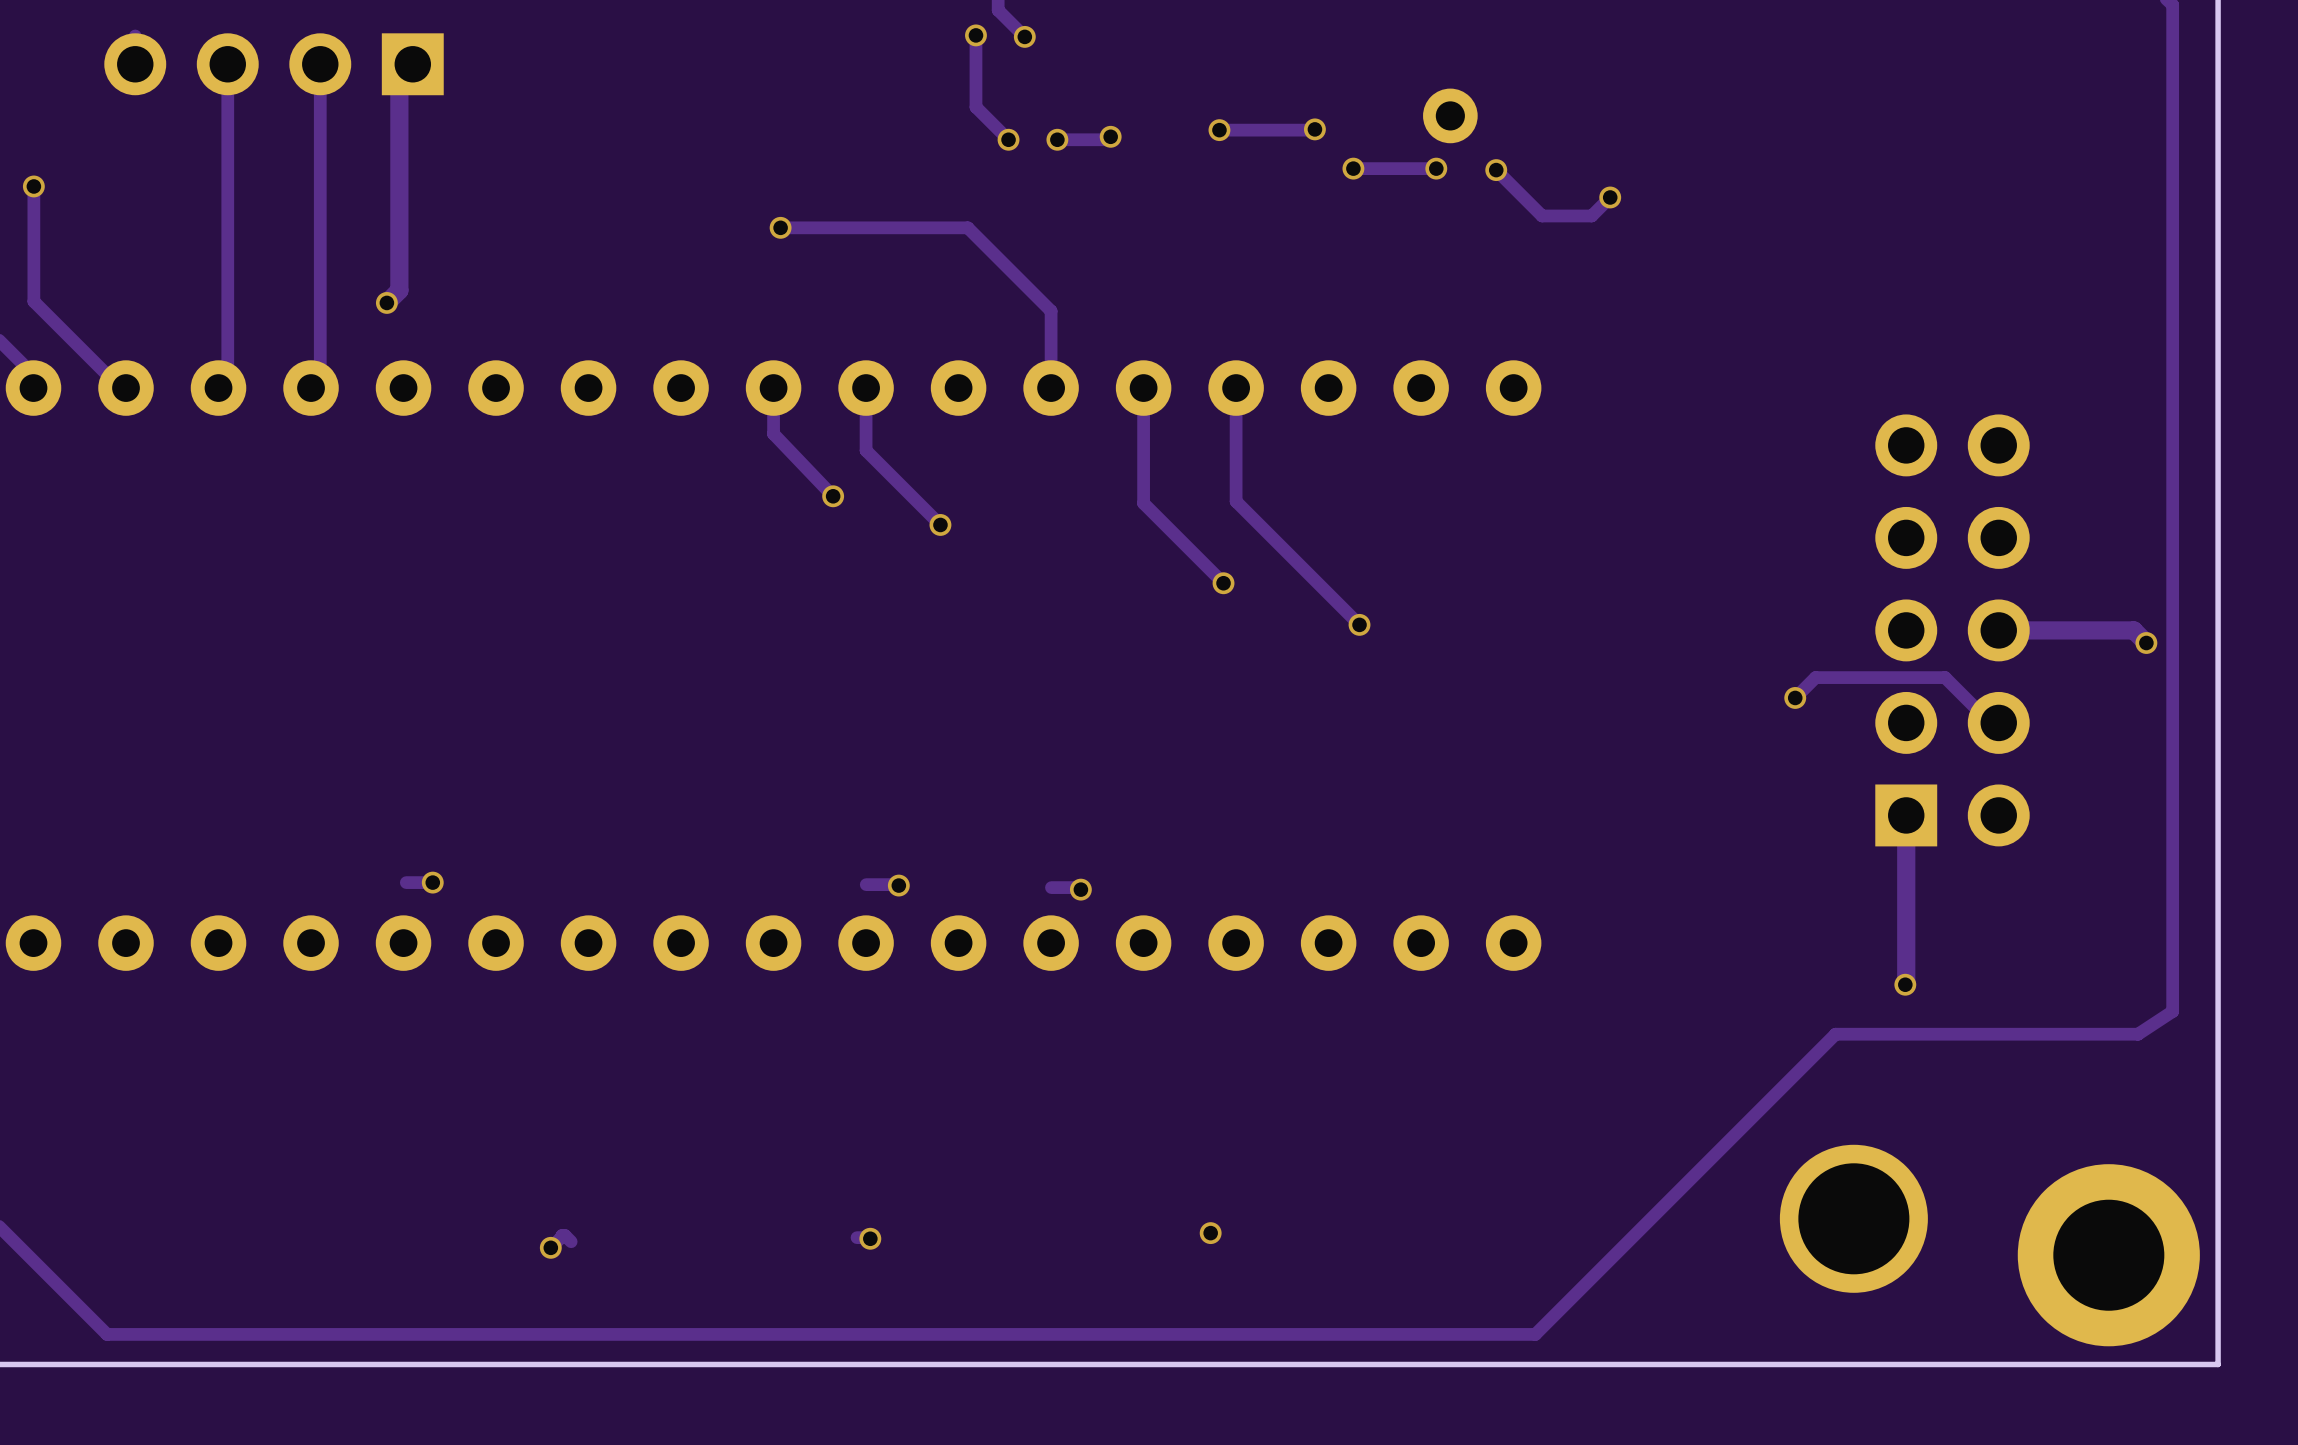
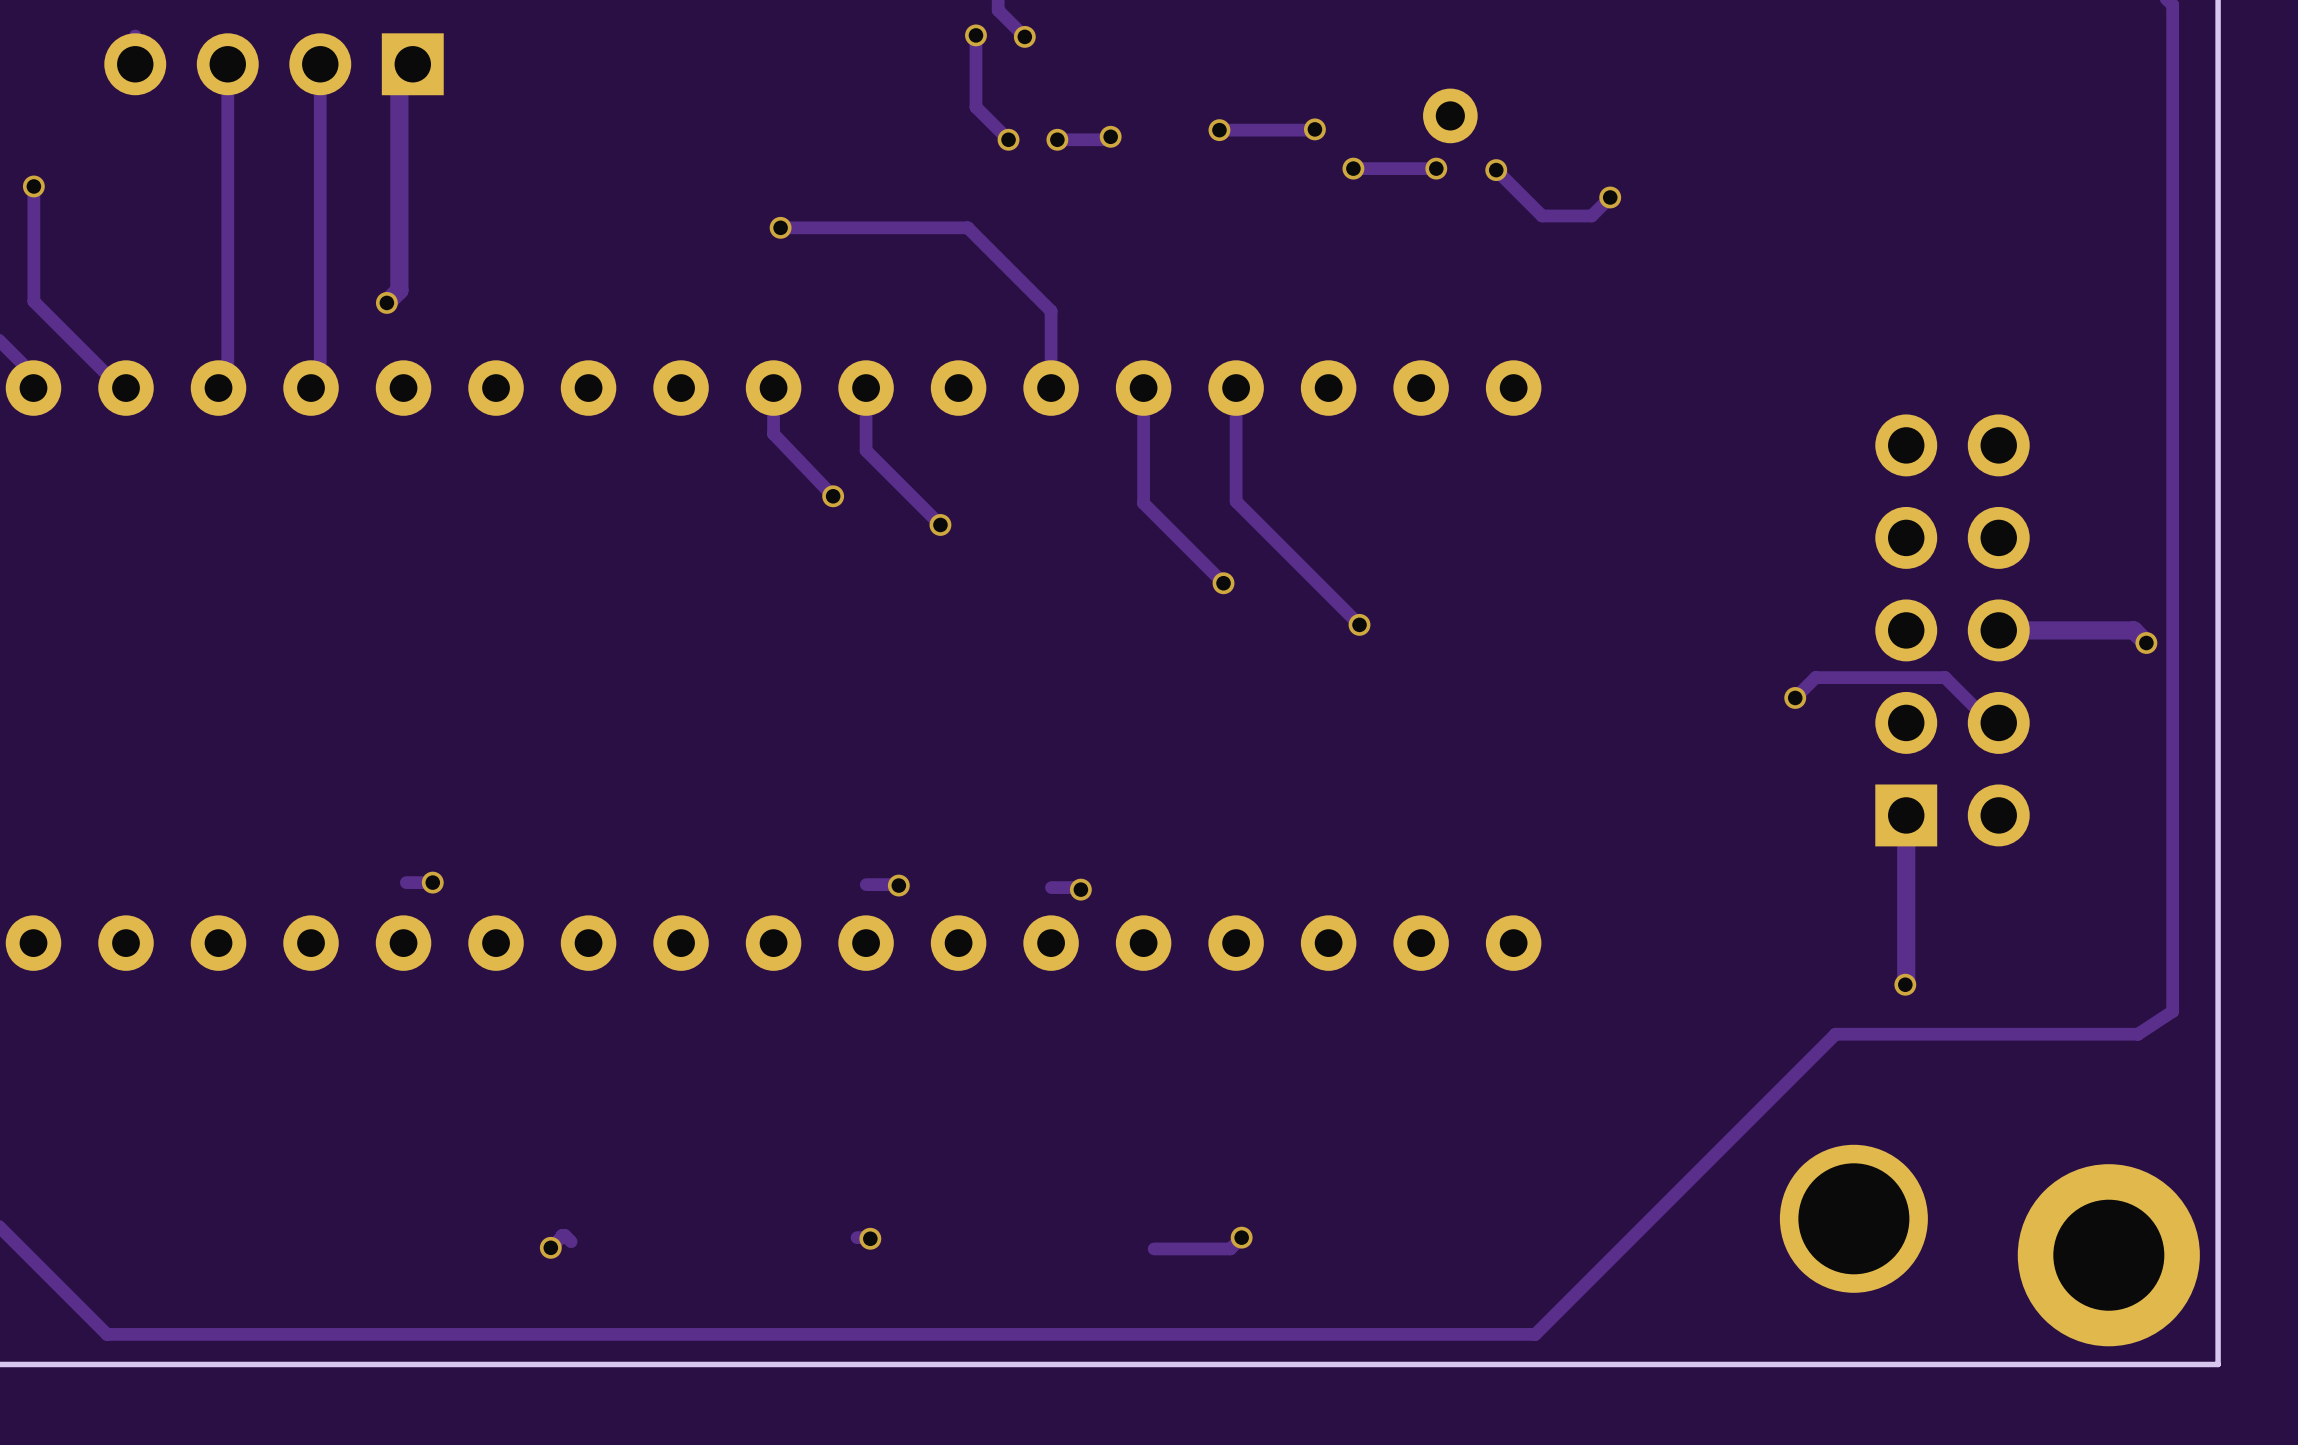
via position: (1210, 1233) -> (1241, 1237)
track: none -> (1241, 1237) (1230, 1248) (1154, 1248)

